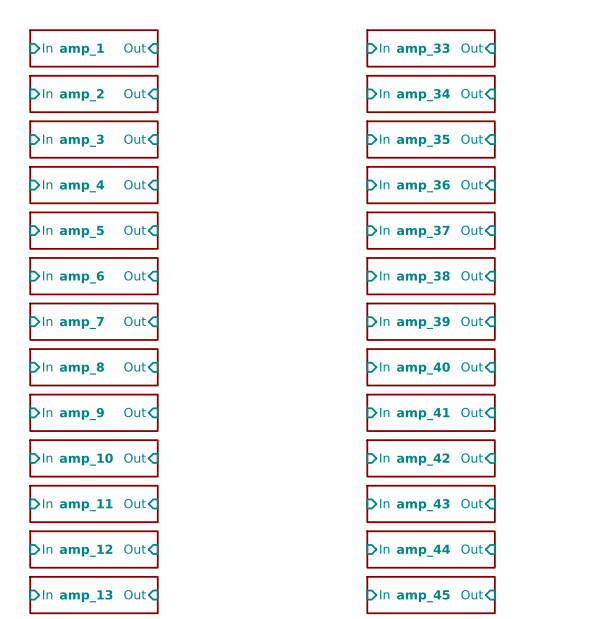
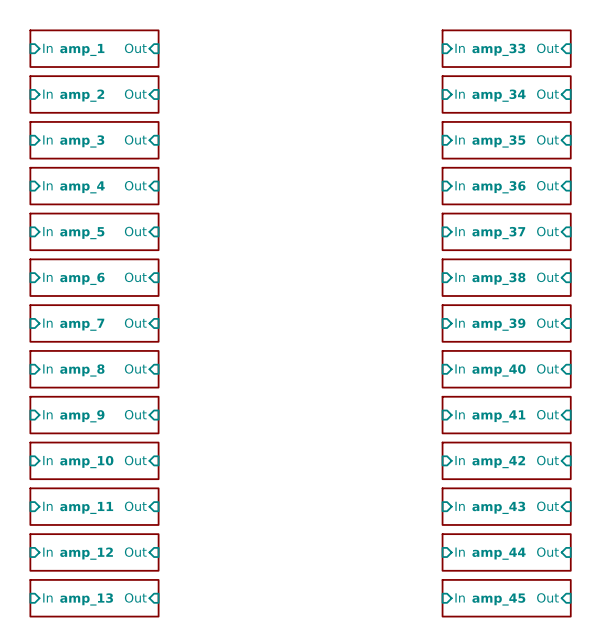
sheet pin: In (384, 48) -> none
sheet amp_33 position: (431, 48) -> (506, 48)
sheet pin: none -> In (460, 48)
sheet pin: Out (472, 48) -> none
sheet pin: none -> Out (547, 48)
sheet pin: In (384, 93) -> none
sheet amp_34 position: (431, 93) -> (506, 94)
sheet pin: none -> In (460, 94)
sheet pin: Out (472, 93) -> none
sheet pin: none -> Out (547, 94)
sheet pin: In (384, 139) -> none
sheet amp_35 position: (431, 139) -> (506, 140)
sheet pin: none -> In (460, 139)
sheet pin: Out (472, 139) -> none
sheet pin: none -> Out (547, 139)
sheet pin: In (384, 184) -> none
sheet pin: none -> In (460, 185)
sheet pin: Out (472, 184) -> none
sheet pin: none -> Out (547, 185)
sheet amp_36 position: (431, 185) -> (506, 186)
sheet pin: In (384, 230) -> none
sheet amp_37 position: (431, 230) -> (506, 231)
sheet pin: none -> In (460, 231)
sheet pin: Out (472, 230) -> none
sheet pin: none -> Out (547, 231)
sheet pin: In (384, 275) -> none
sheet pin: none -> In (460, 277)
sheet pin: Out (472, 275) -> none
sheet pin: none -> Out (547, 277)
sheet amp_38 position: (431, 276) -> (506, 277)
sheet pin: In (384, 321) -> none
sheet amp_39 position: (431, 321) -> (506, 323)
sheet pin: none -> In (460, 323)
sheet pin: Out (472, 321) -> none
sheet pin: none -> Out (547, 323)
sheet pin: In (384, 366) -> none
sheet pin: none -> In (460, 368)
sheet pin: Out (472, 366) -> none
sheet pin: none -> Out (547, 368)
sheet amp_40 position: (431, 367) -> (506, 369)
sheet pin: In (384, 412) -> none
sheet amp_41 position: (431, 412) -> (506, 415)
sheet pin: none -> In (460, 414)
sheet pin: Out (472, 412) -> none
sheet pin: none -> Out (547, 414)
sheet pin: In (384, 458) -> none
sheet amp_42 position: (431, 458) -> (506, 460)
sheet pin: none -> In (460, 460)
sheet pin: Out (472, 458) -> none
sheet pin: none -> Out (547, 460)
sheet pin: In (384, 503) -> none
sheet amp_43 position: (431, 503) -> (506, 506)
sheet pin: none -> In (460, 506)
sheet pin: Out (472, 503) -> none
sheet pin: none -> Out (547, 506)
sheet pin: In (384, 549) -> none
sheet amp_44 position: (431, 549) -> (506, 552)
sheet pin: none -> In (460, 552)
sheet pin: Out (472, 549) -> none
sheet pin: none -> Out (547, 552)
sheet pin: In (384, 594) -> none
sheet pin: none -> In (460, 597)
sheet pin: Out (472, 594) -> none
sheet pin: none -> Out (547, 597)
sheet amp_45 position: (431, 595) -> (506, 598)

